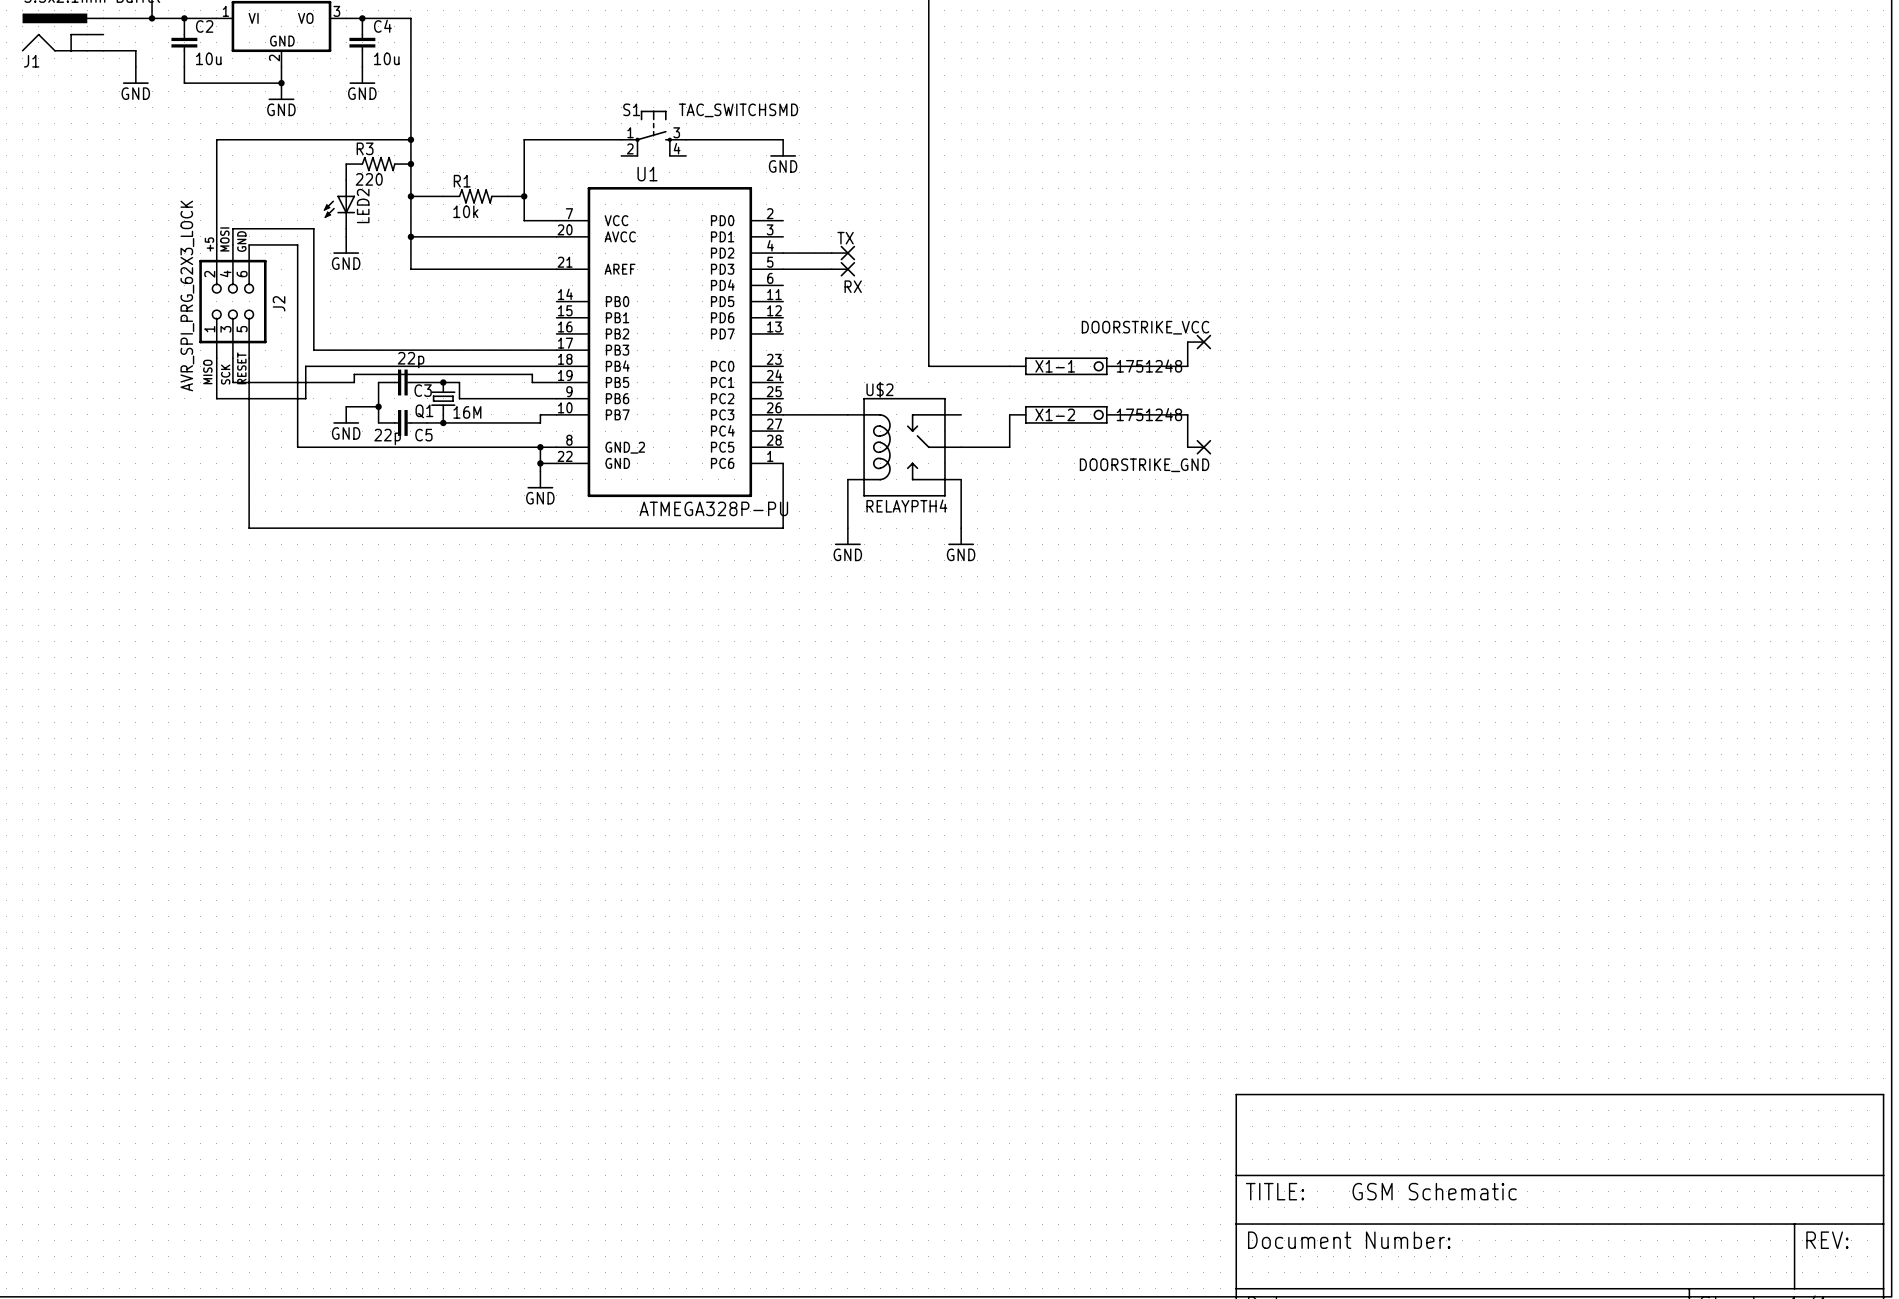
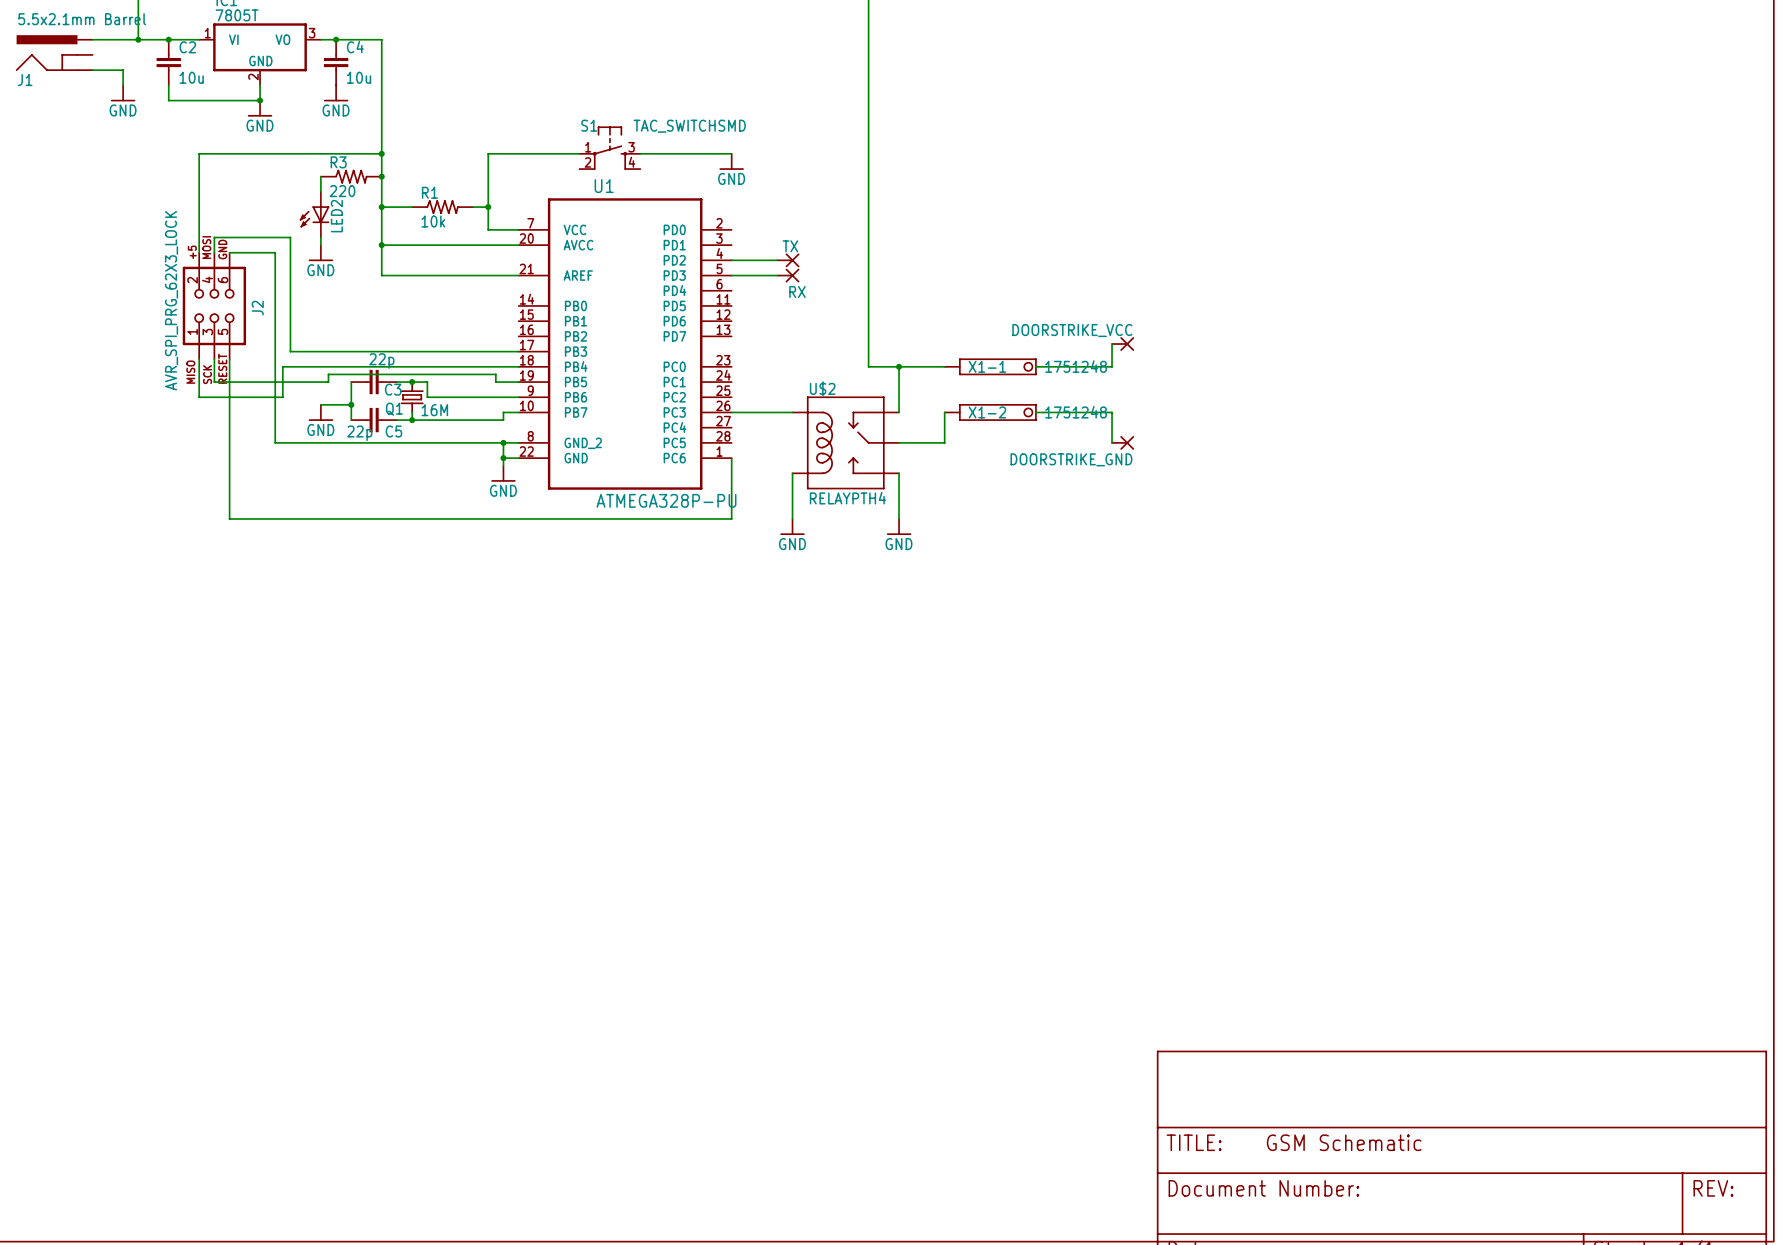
wire: none -> (899, 366) (899, 412)
junction: none -> (899, 366)

